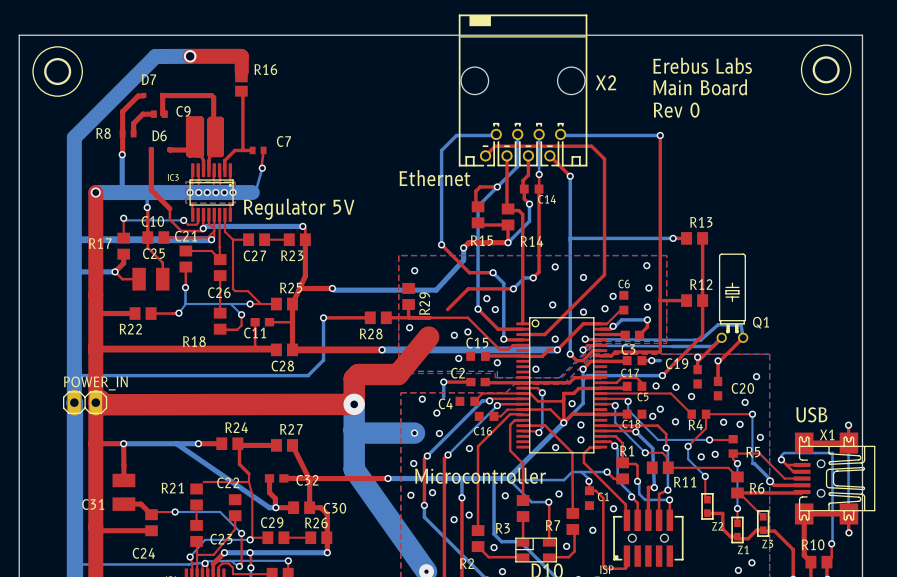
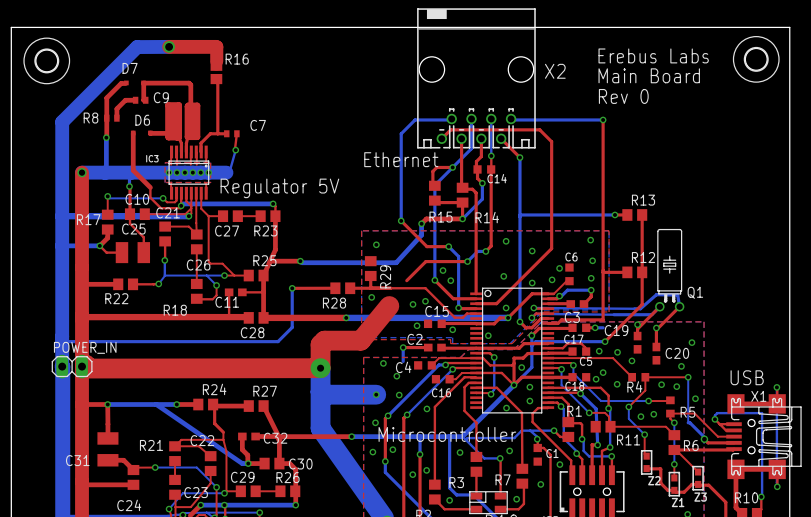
top track: none -> (181, 439) (175, 446) (198, 446) (210, 456)

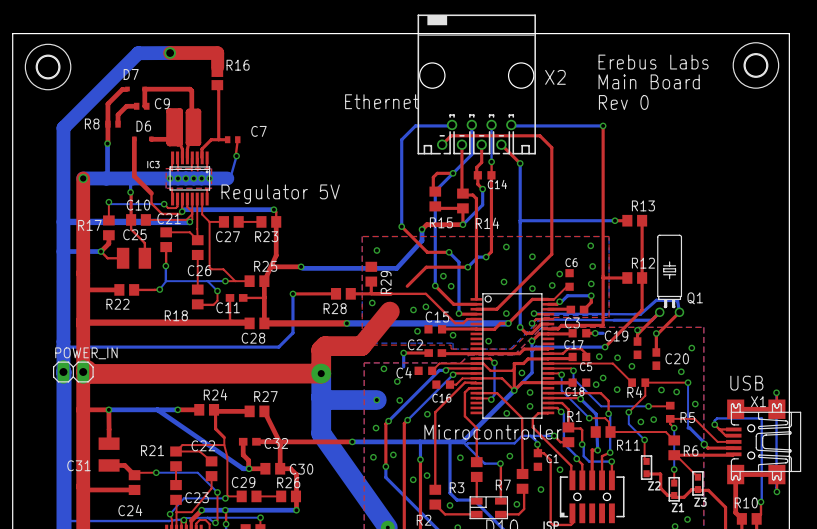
text position: Ethernet (401, 159) -> Ethernet (382, 101)
text position: Microcontroller (447, 434) -> Microcontroller (493, 432)

